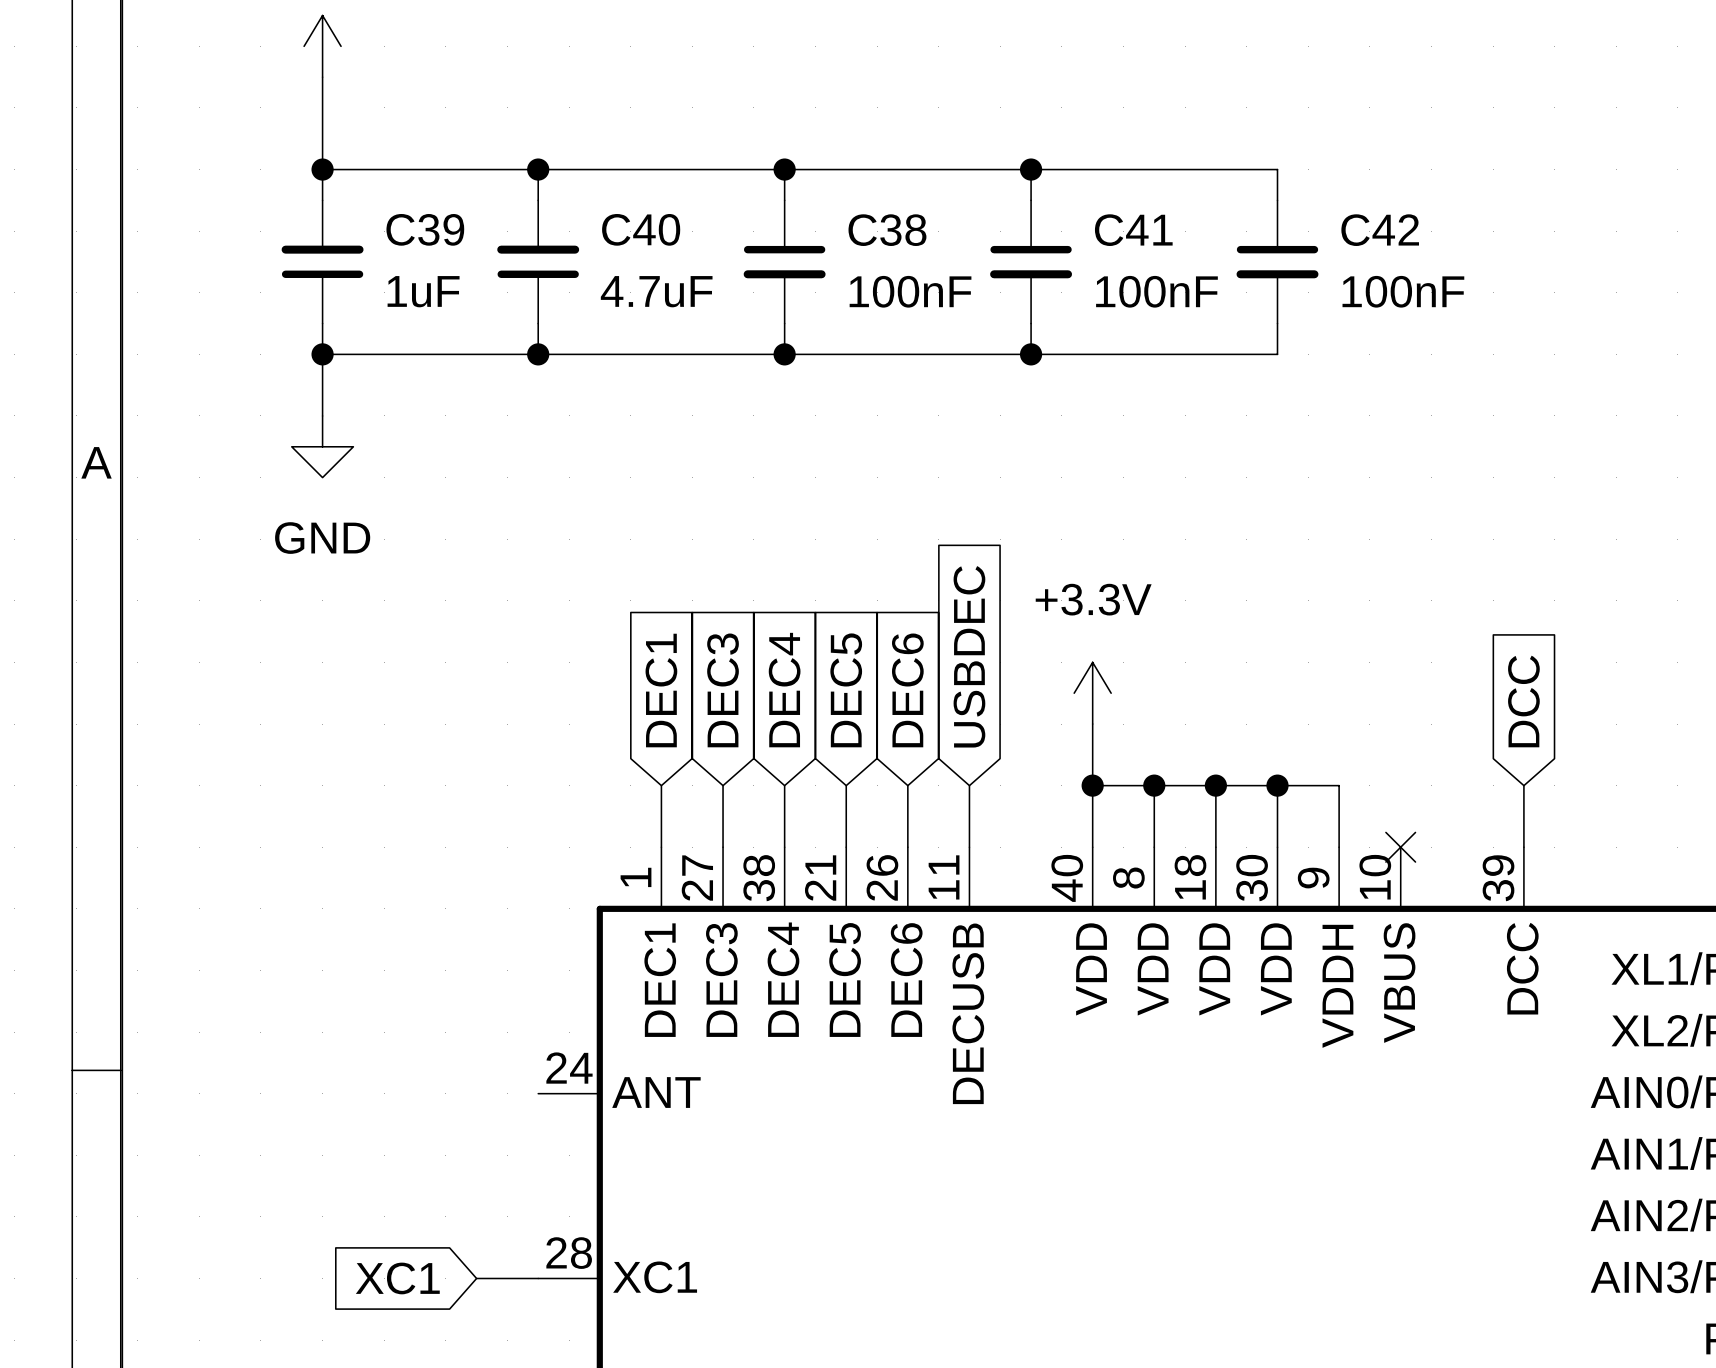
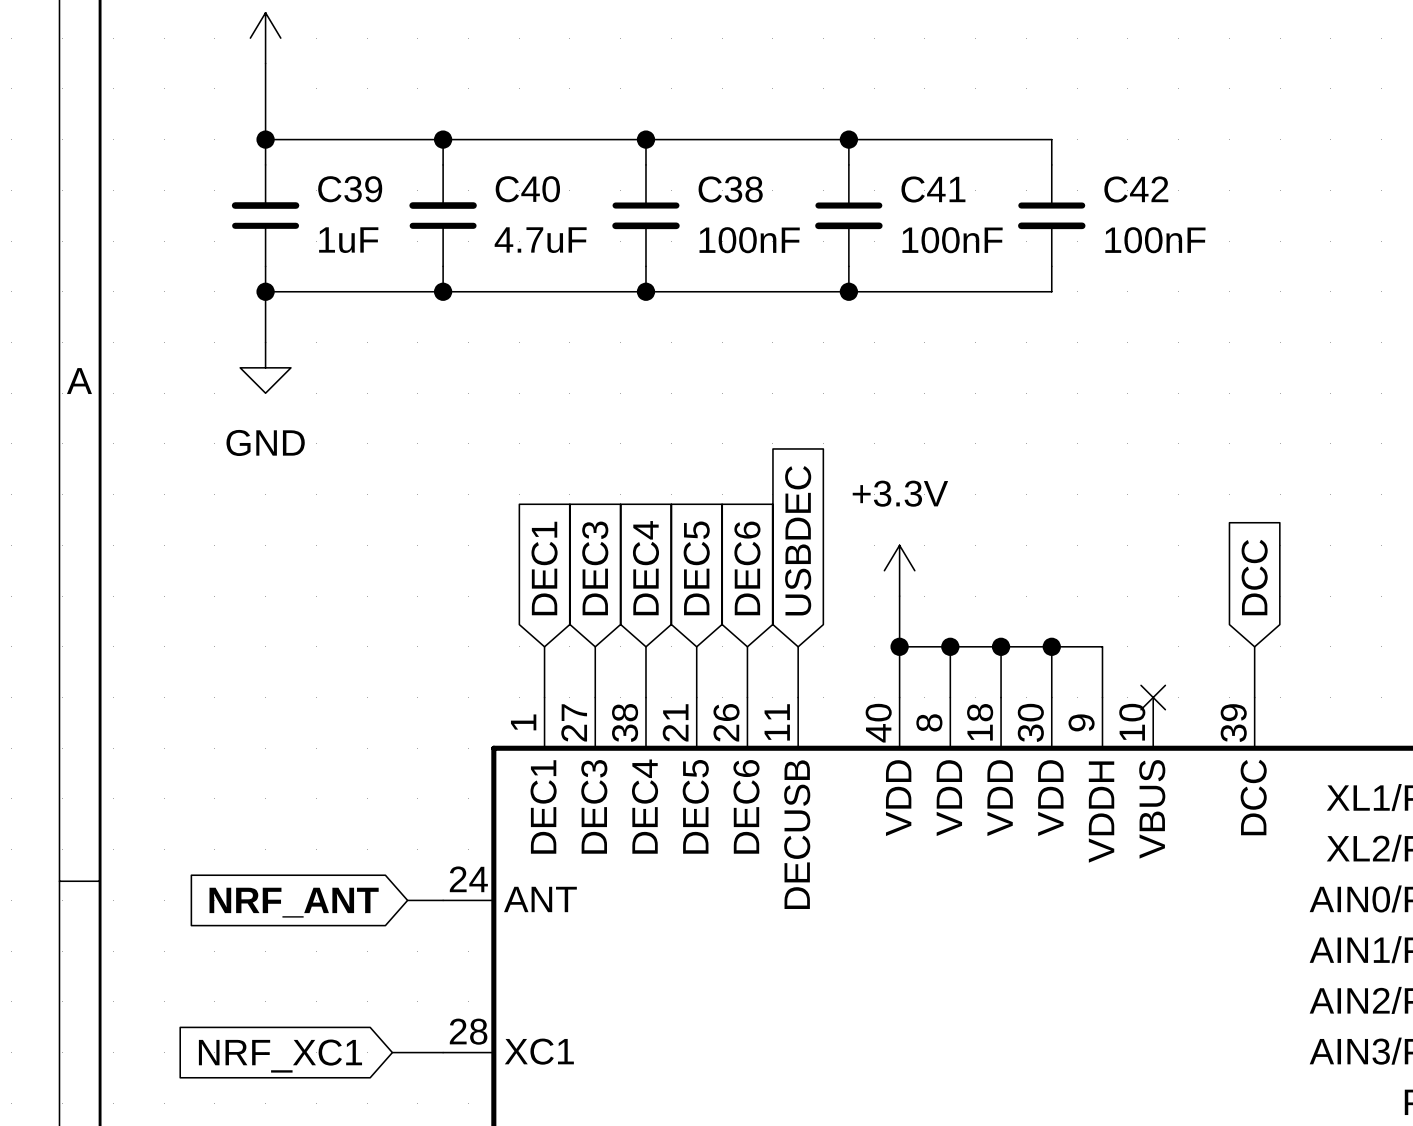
wire: none -> (407, 900) (443, 900)
global label: none -> NRF_ANT (294, 902)
global label: XC1 (397, 1278) -> NRF_XC1 (280, 1056)

